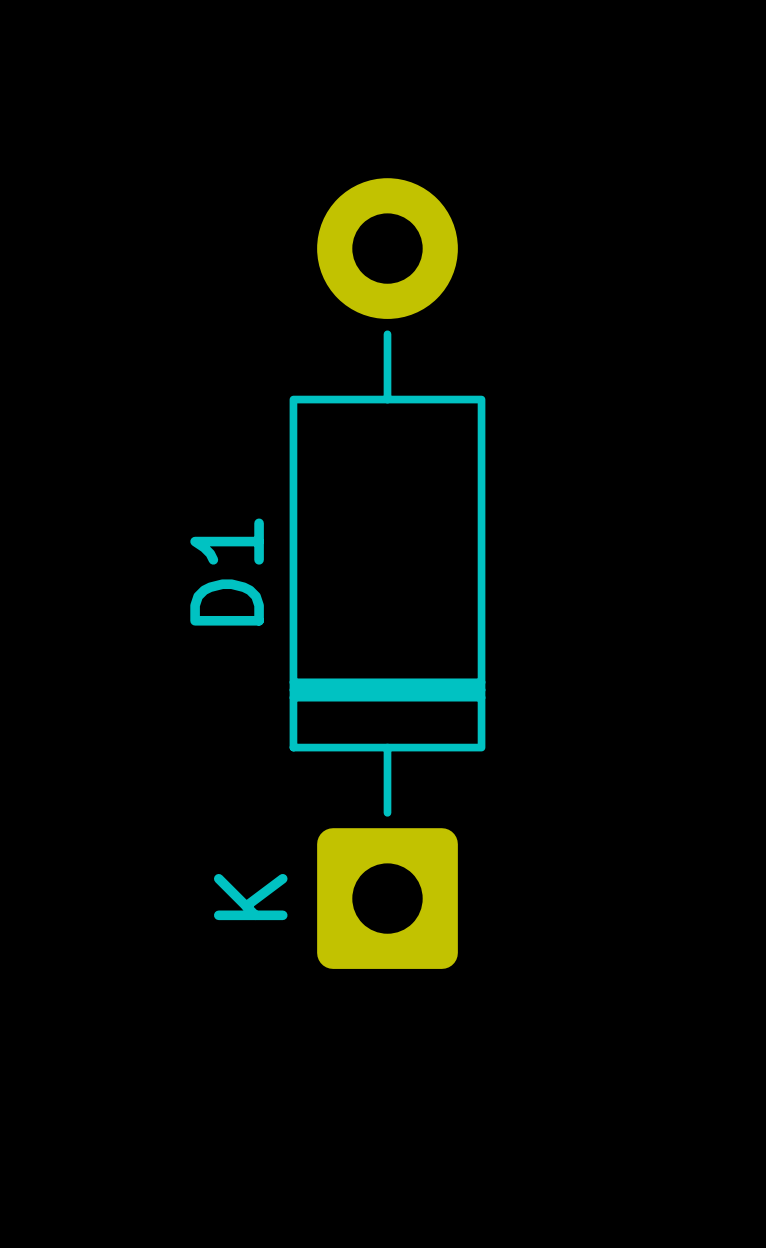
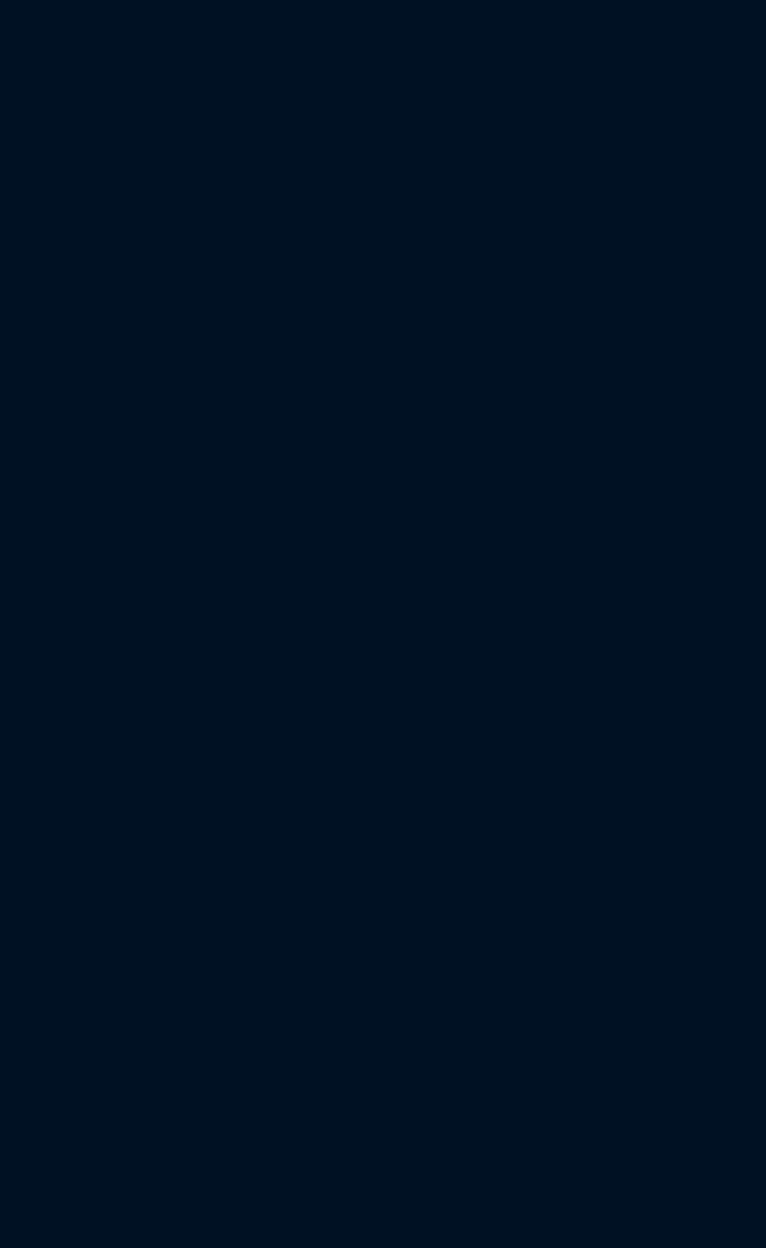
D1: (387, 573) -> none

